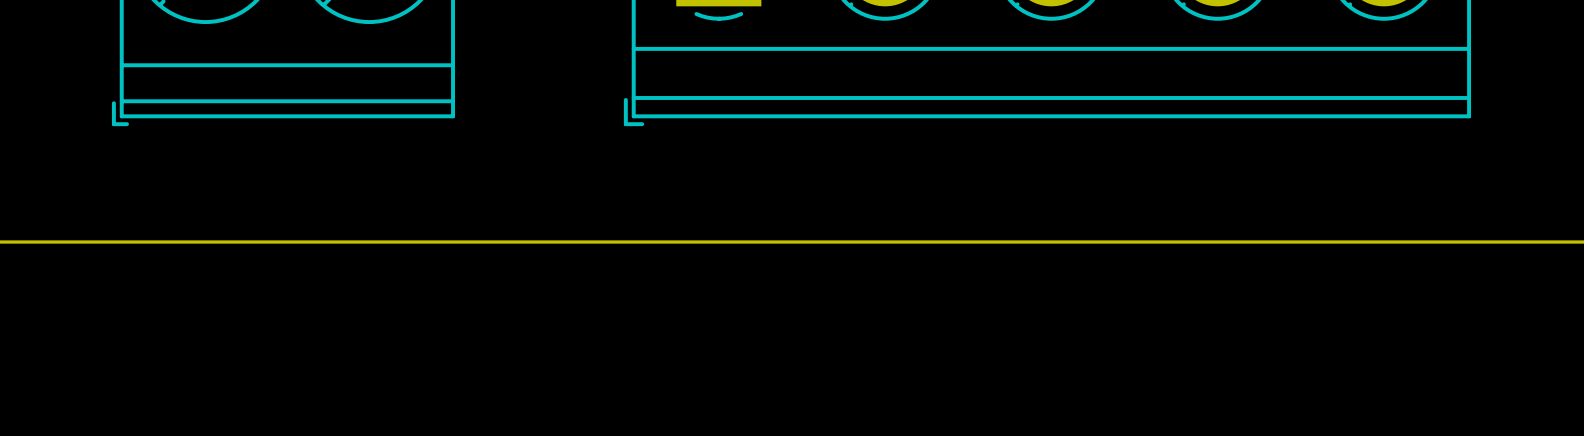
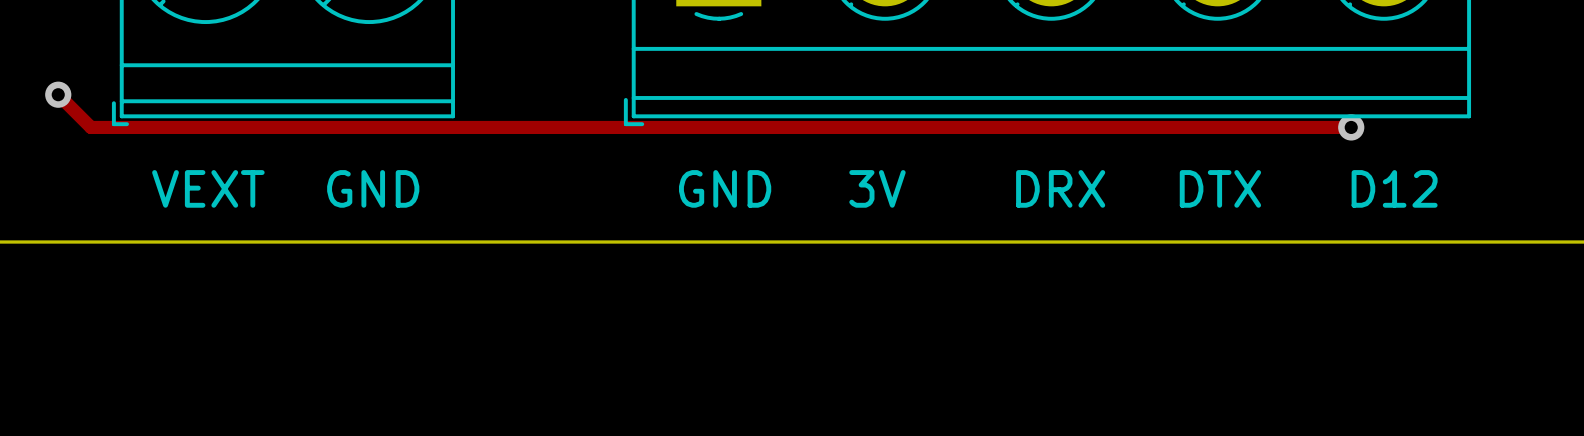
track: none -> (58, 94) (90, 127) (1351, 127)
via: none -> (58, 94)
via: none -> (1351, 127)
text: none -> VEXT (208, 188)
text: none -> GND (373, 188)
text: none -> GND (725, 188)
text: none -> 3V (877, 188)
text: none -> DRX (1060, 188)
text: none -> DTX (1220, 188)
text: none -> D12 (1394, 188)

